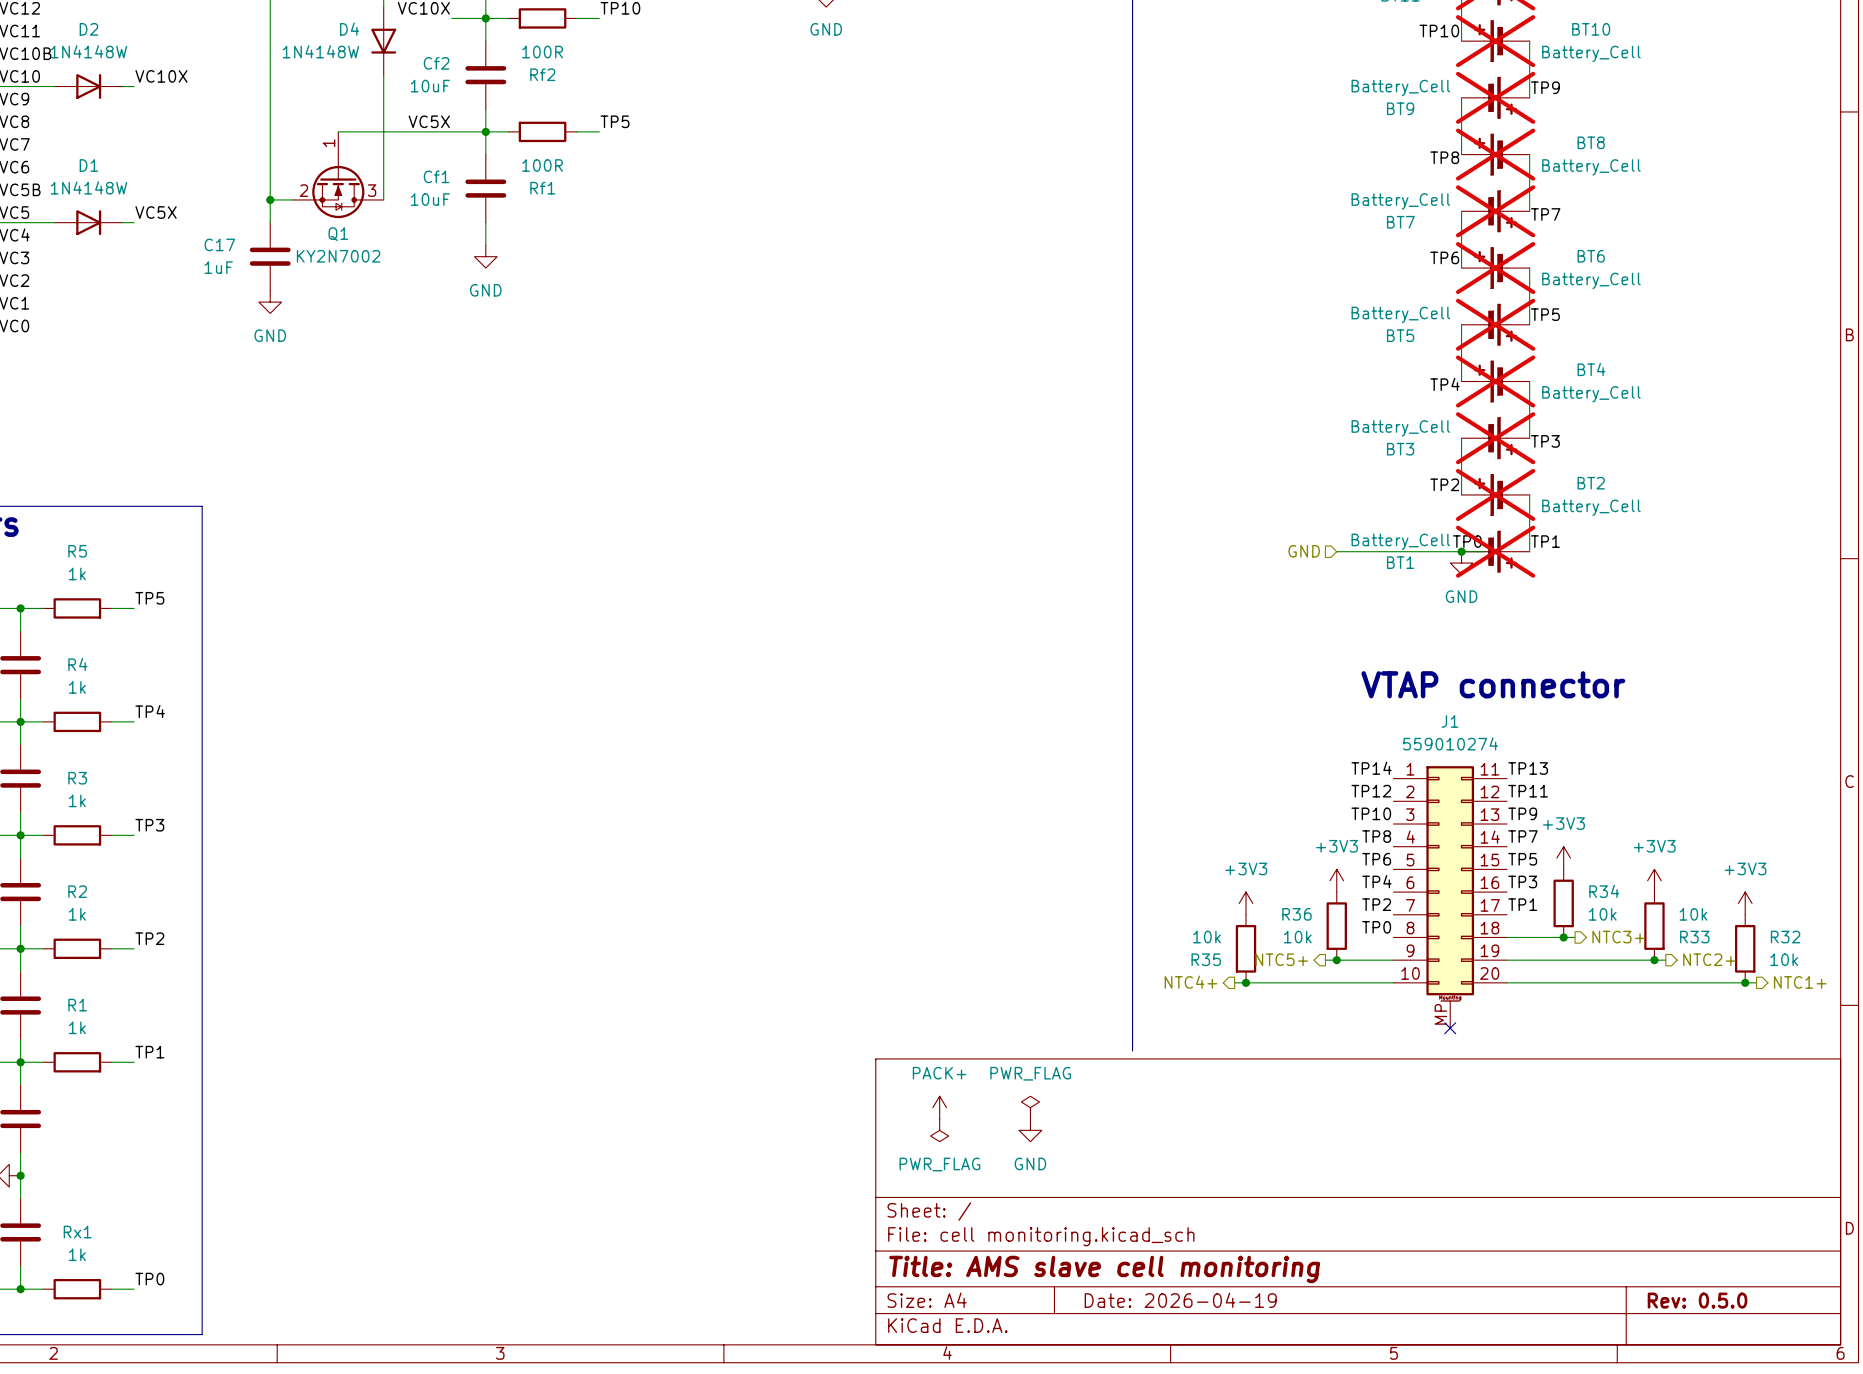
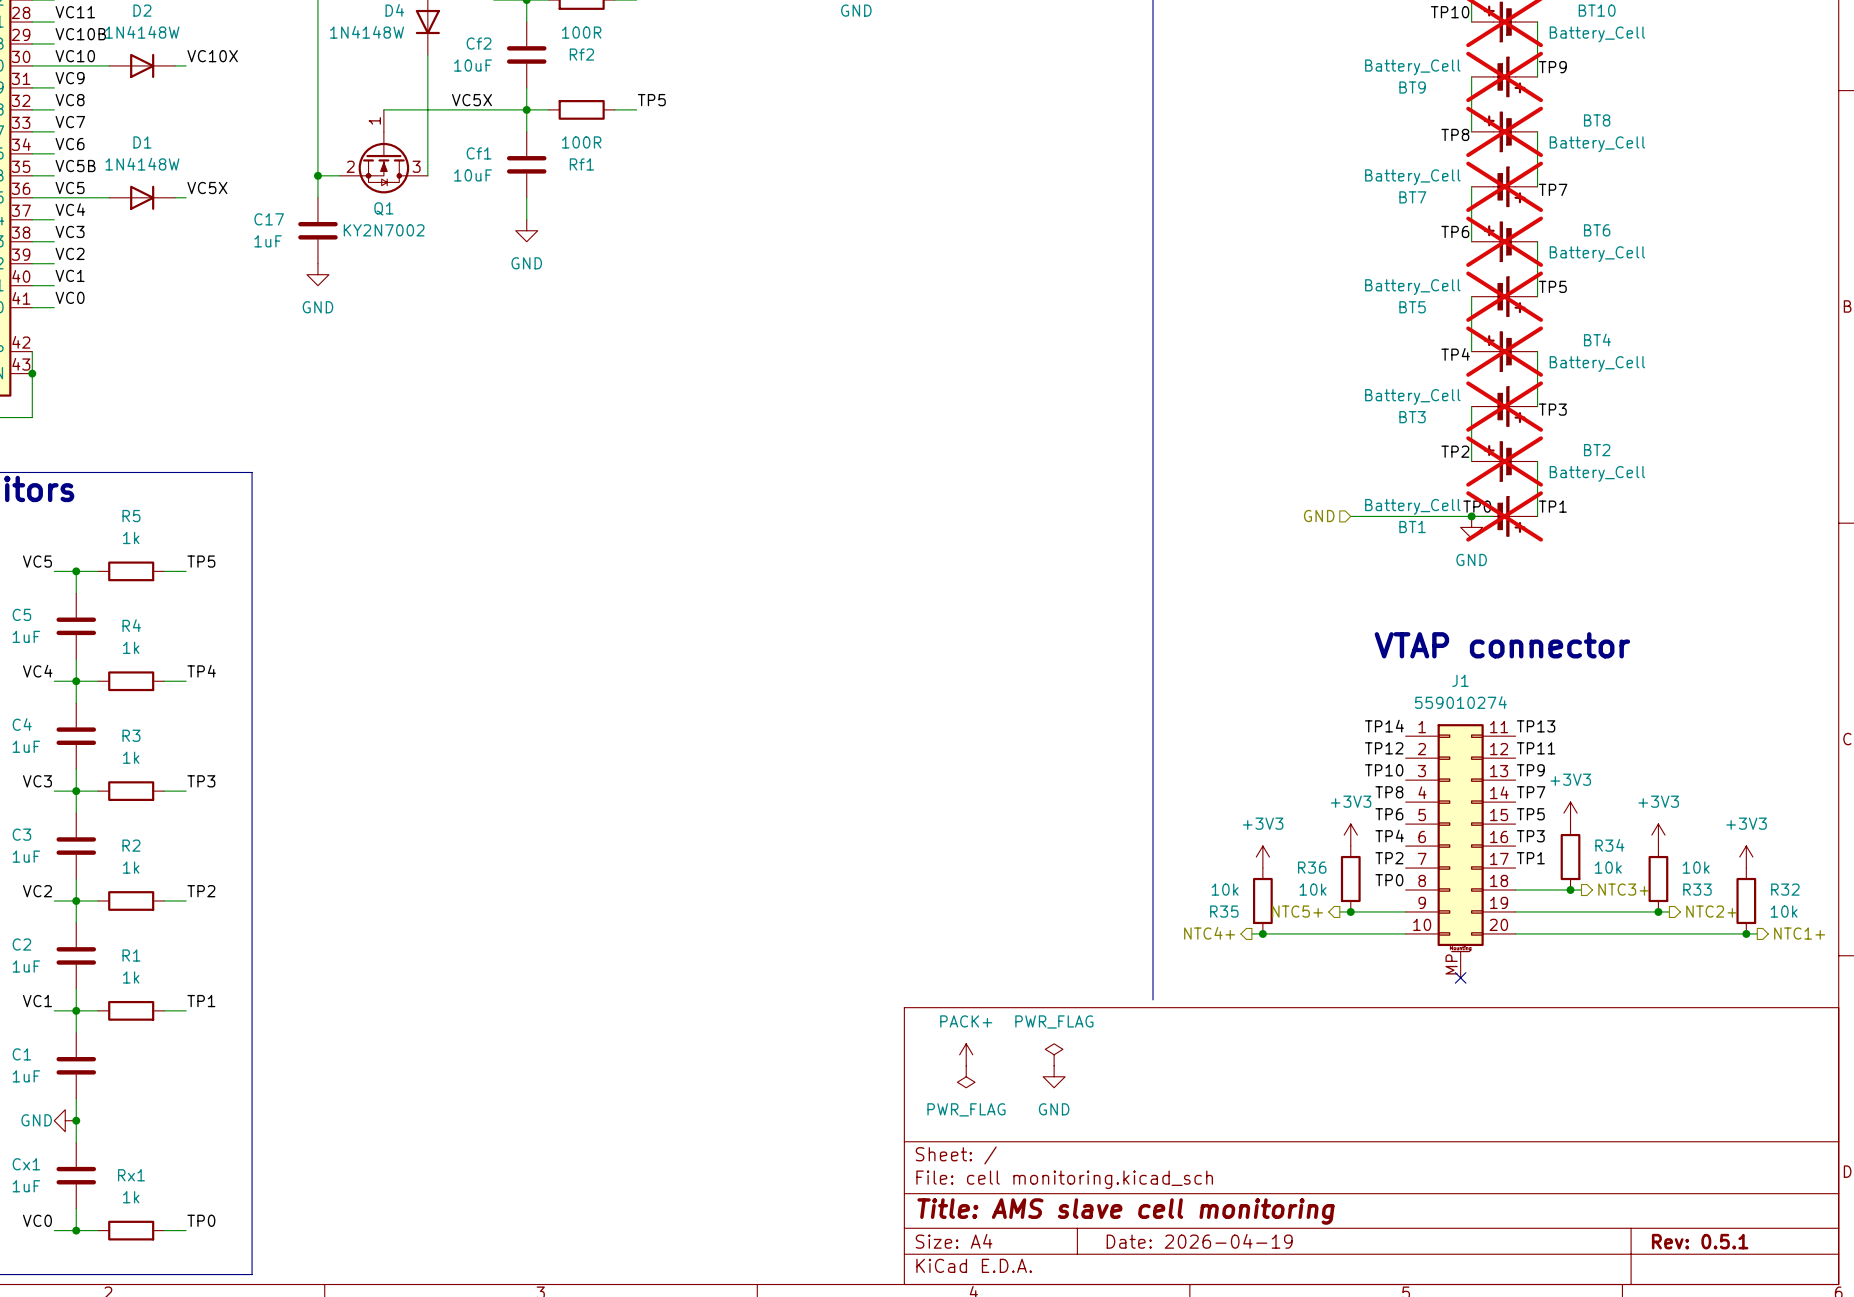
title block: Rev: 0.5.0 (1697, 1300) -> Rev: 0.5.1 (1700, 1241)

